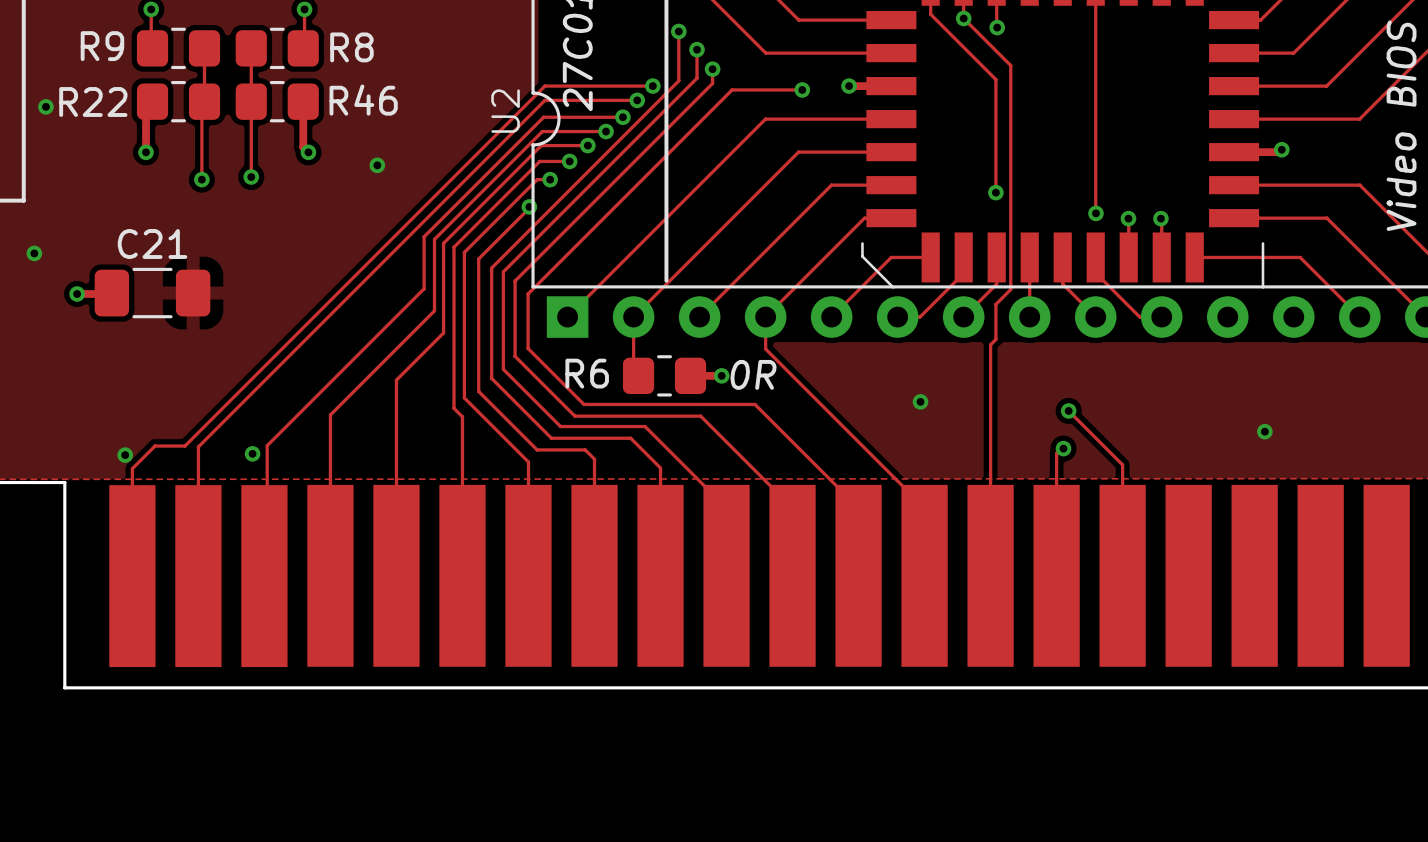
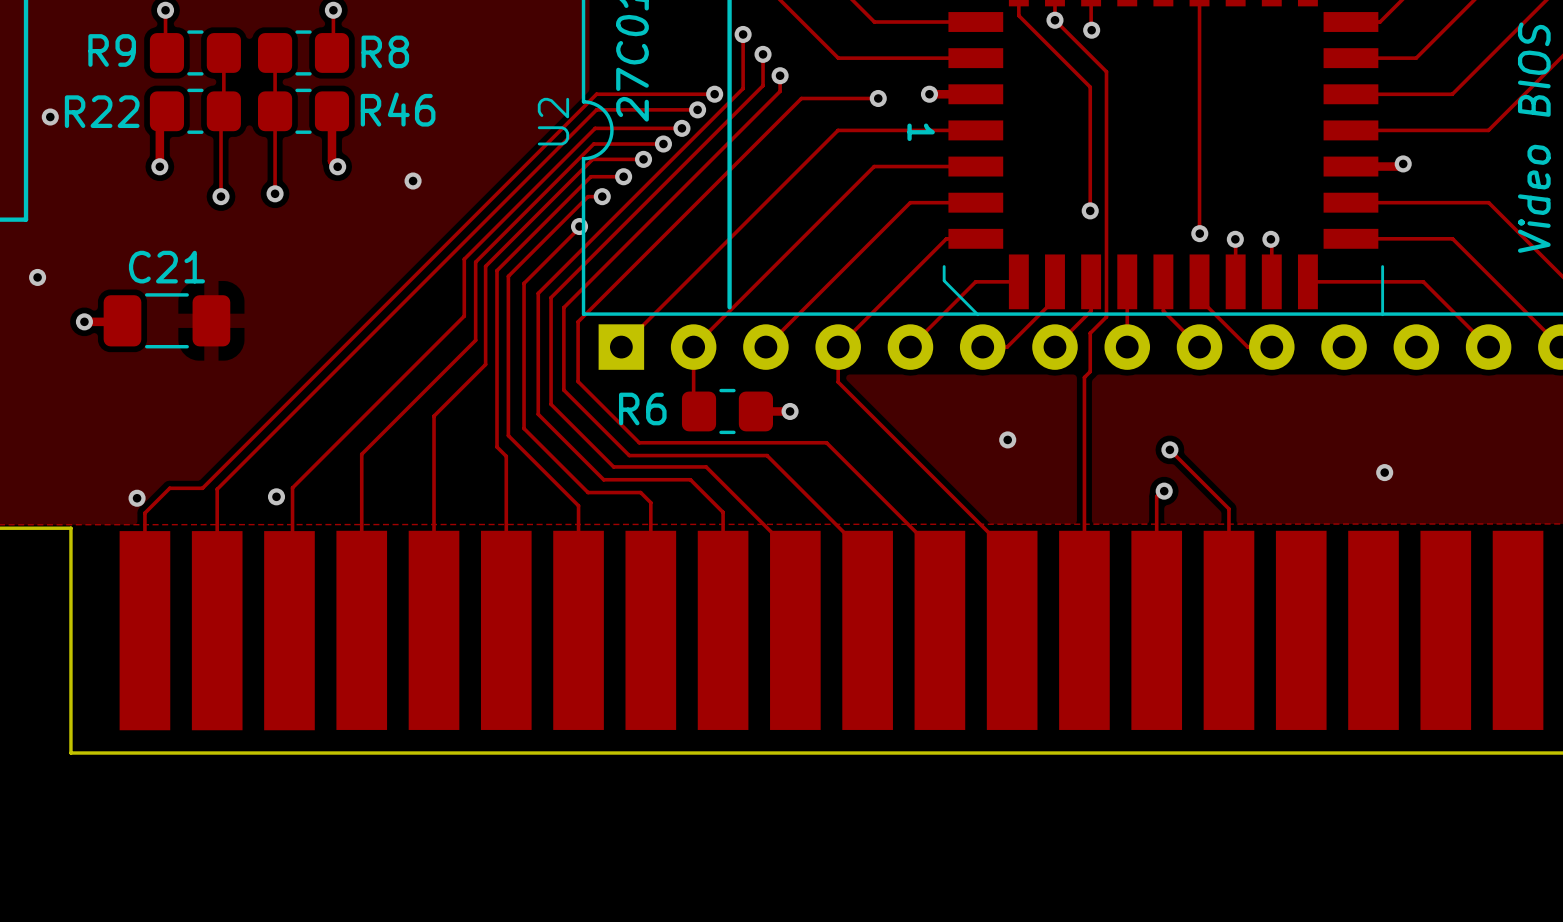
text: none -> 1 (921, 132)
R6 value: 0R (753, 374) -> none

